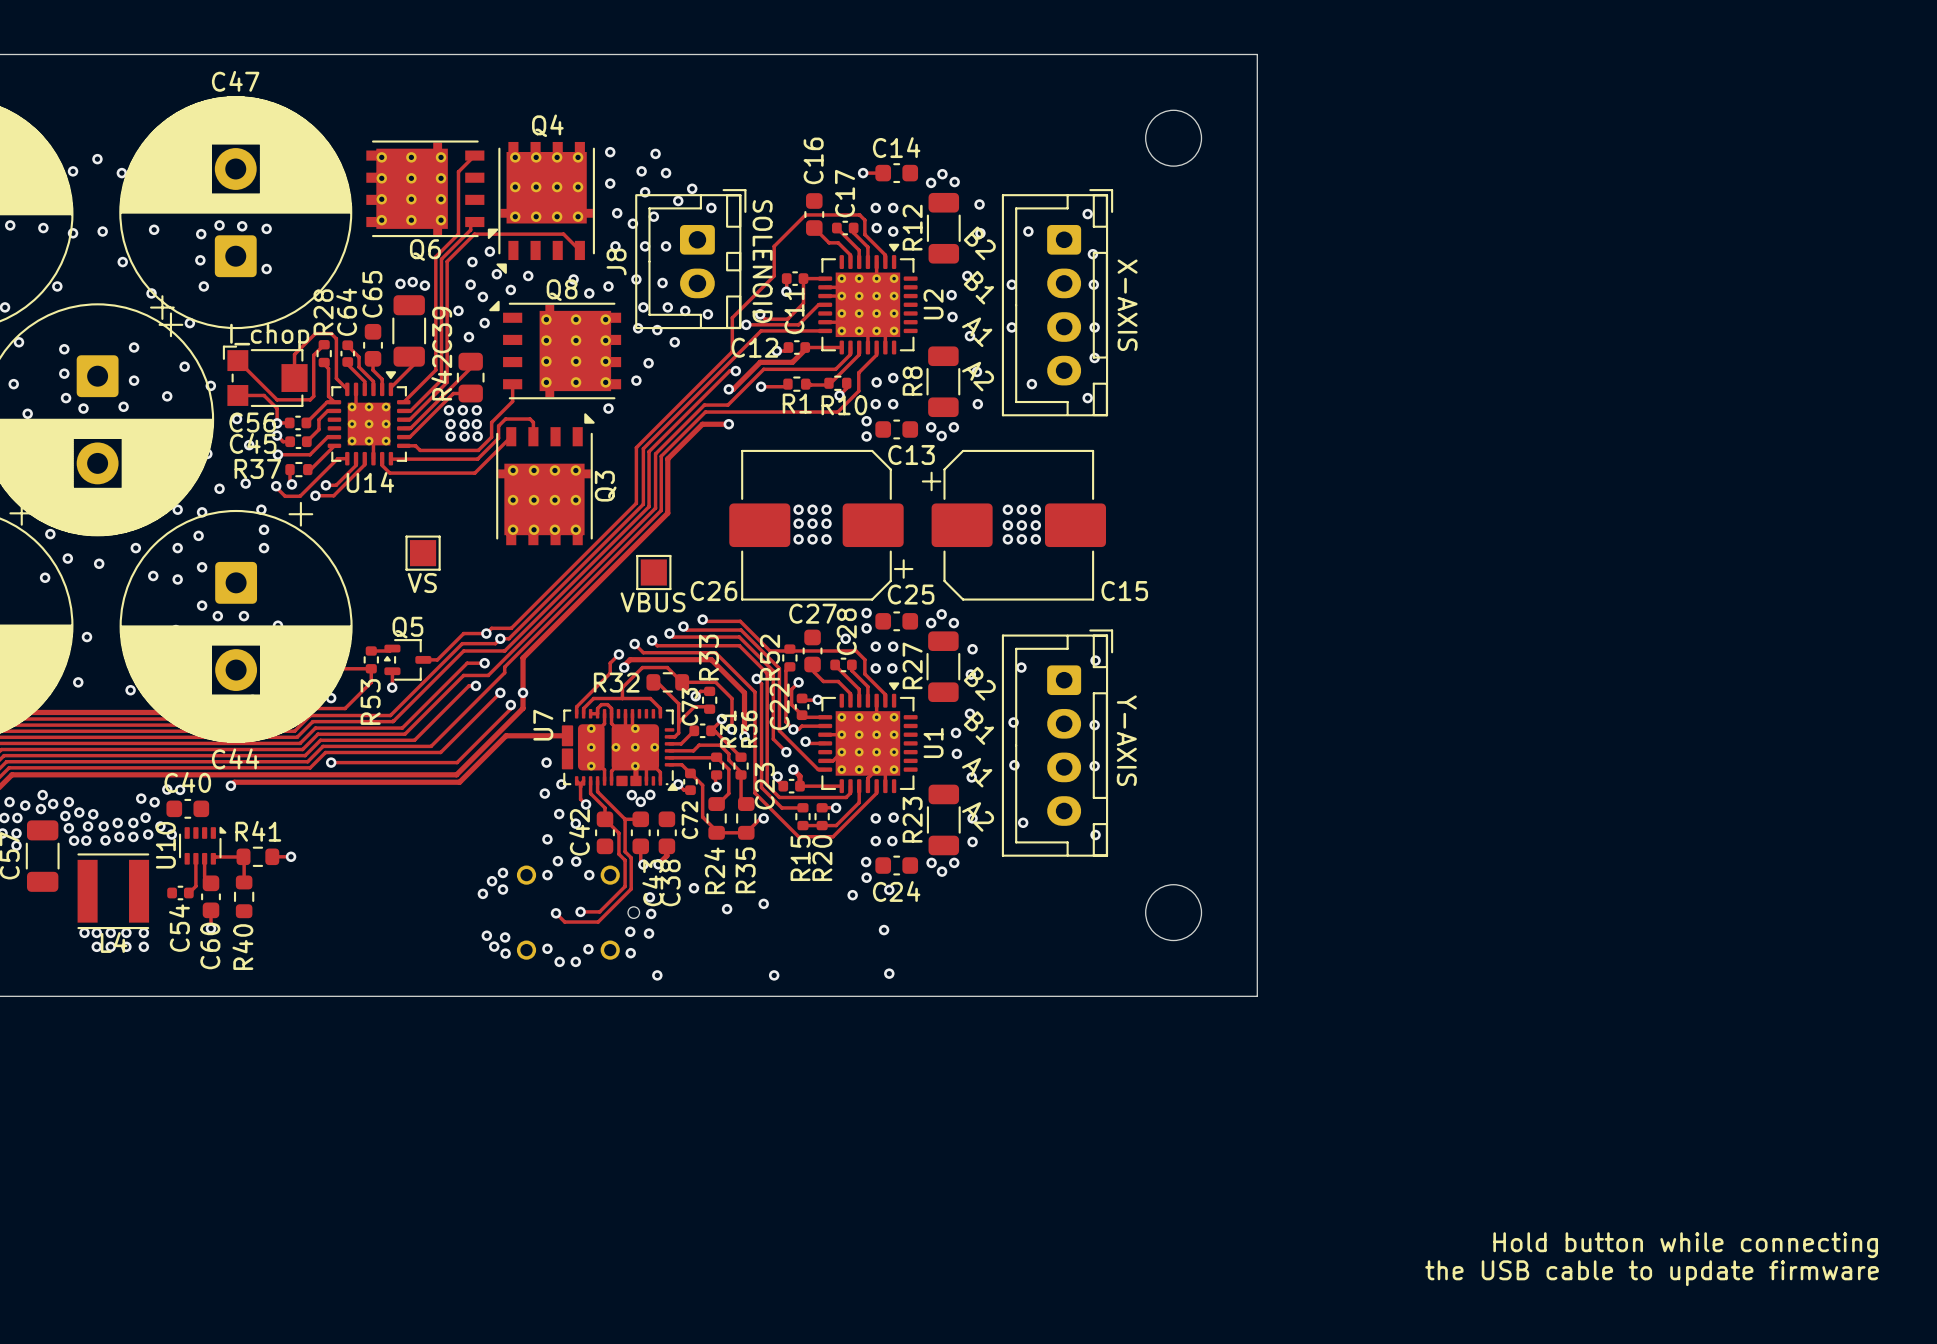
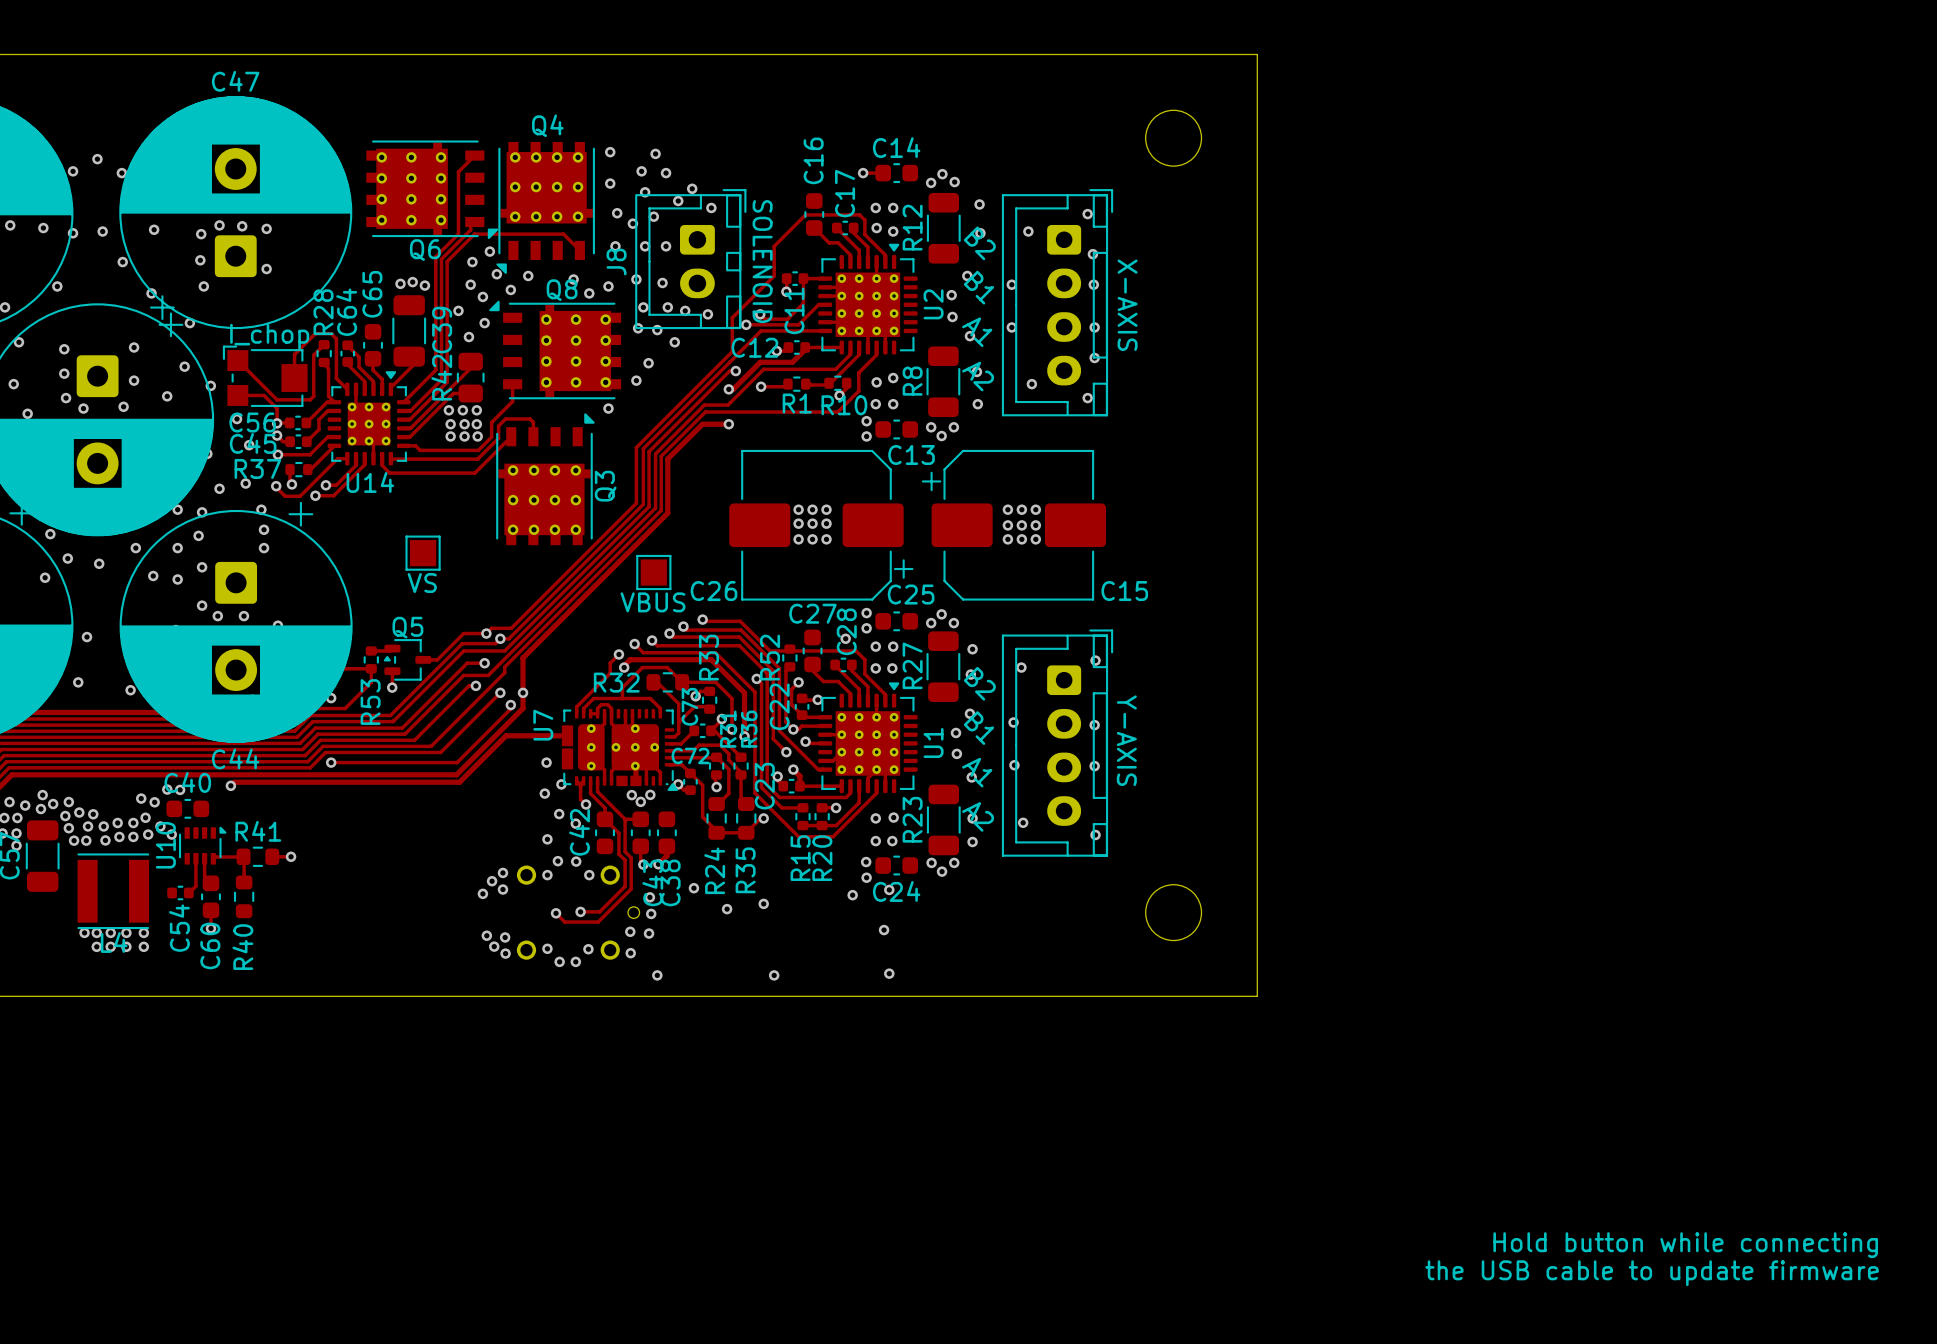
C72 name rotation: 0° (689, 820) -> 90° clockwise (690, 755)
C72 name position: C72 (689, 820) -> C72 (690, 755)

